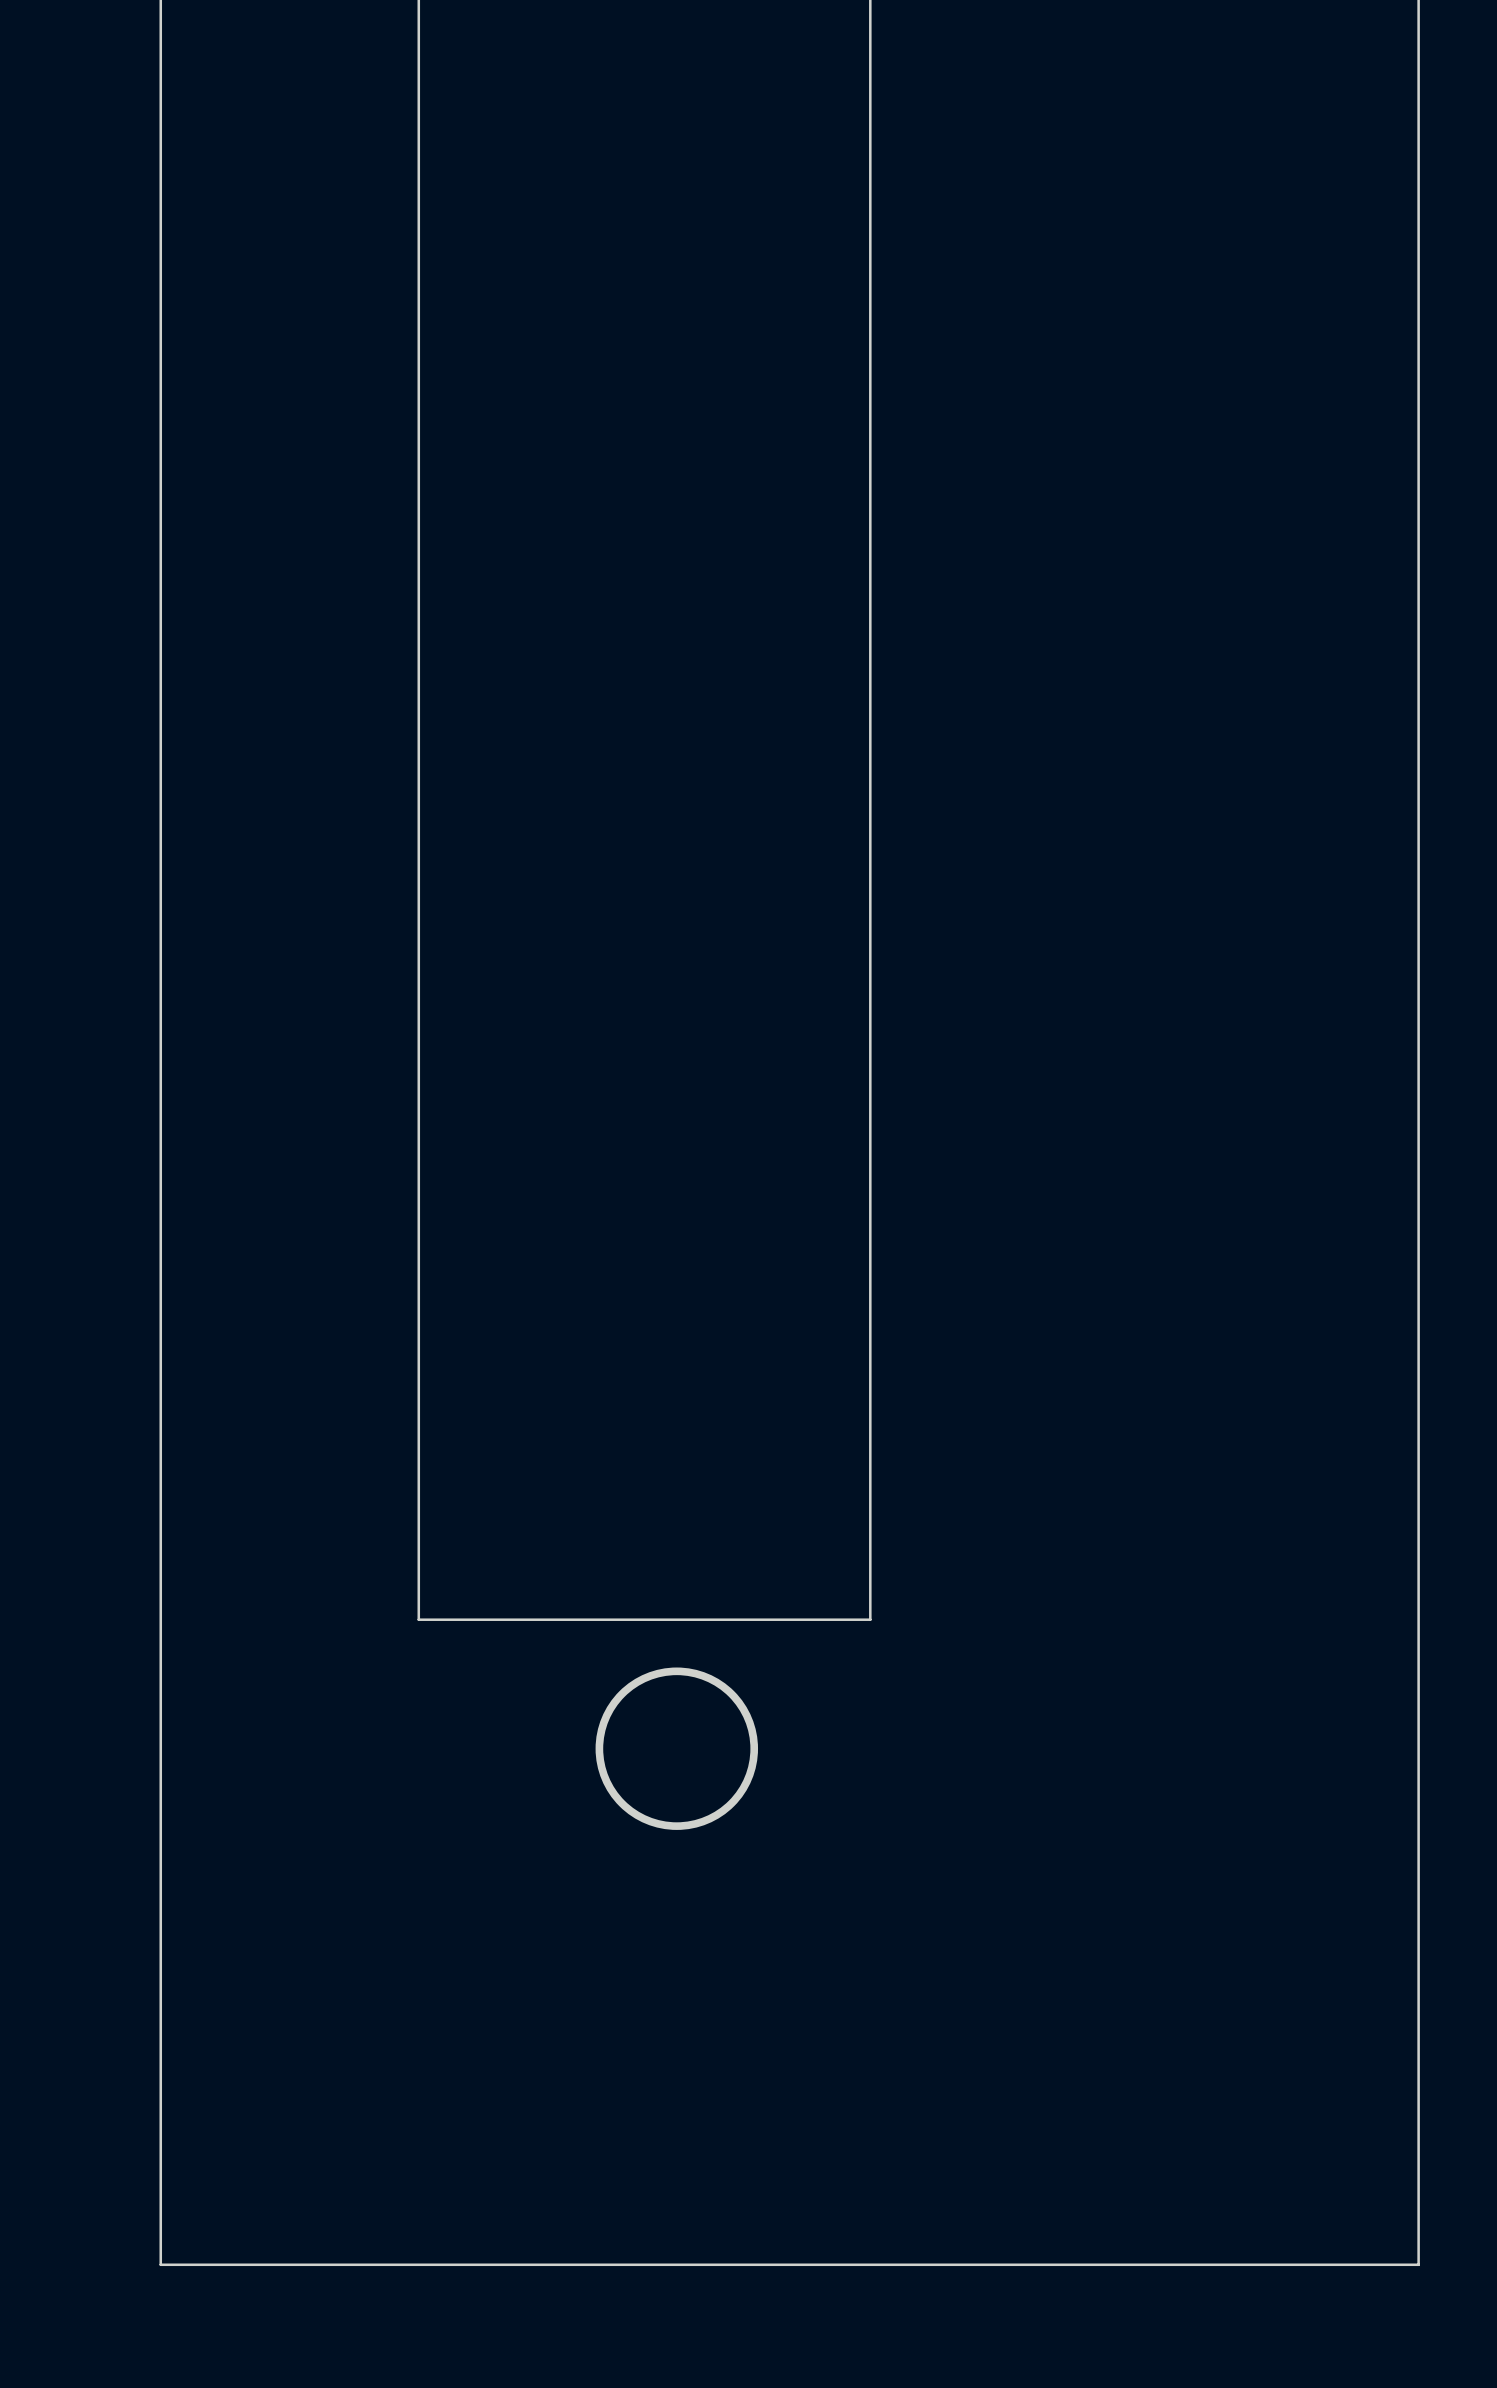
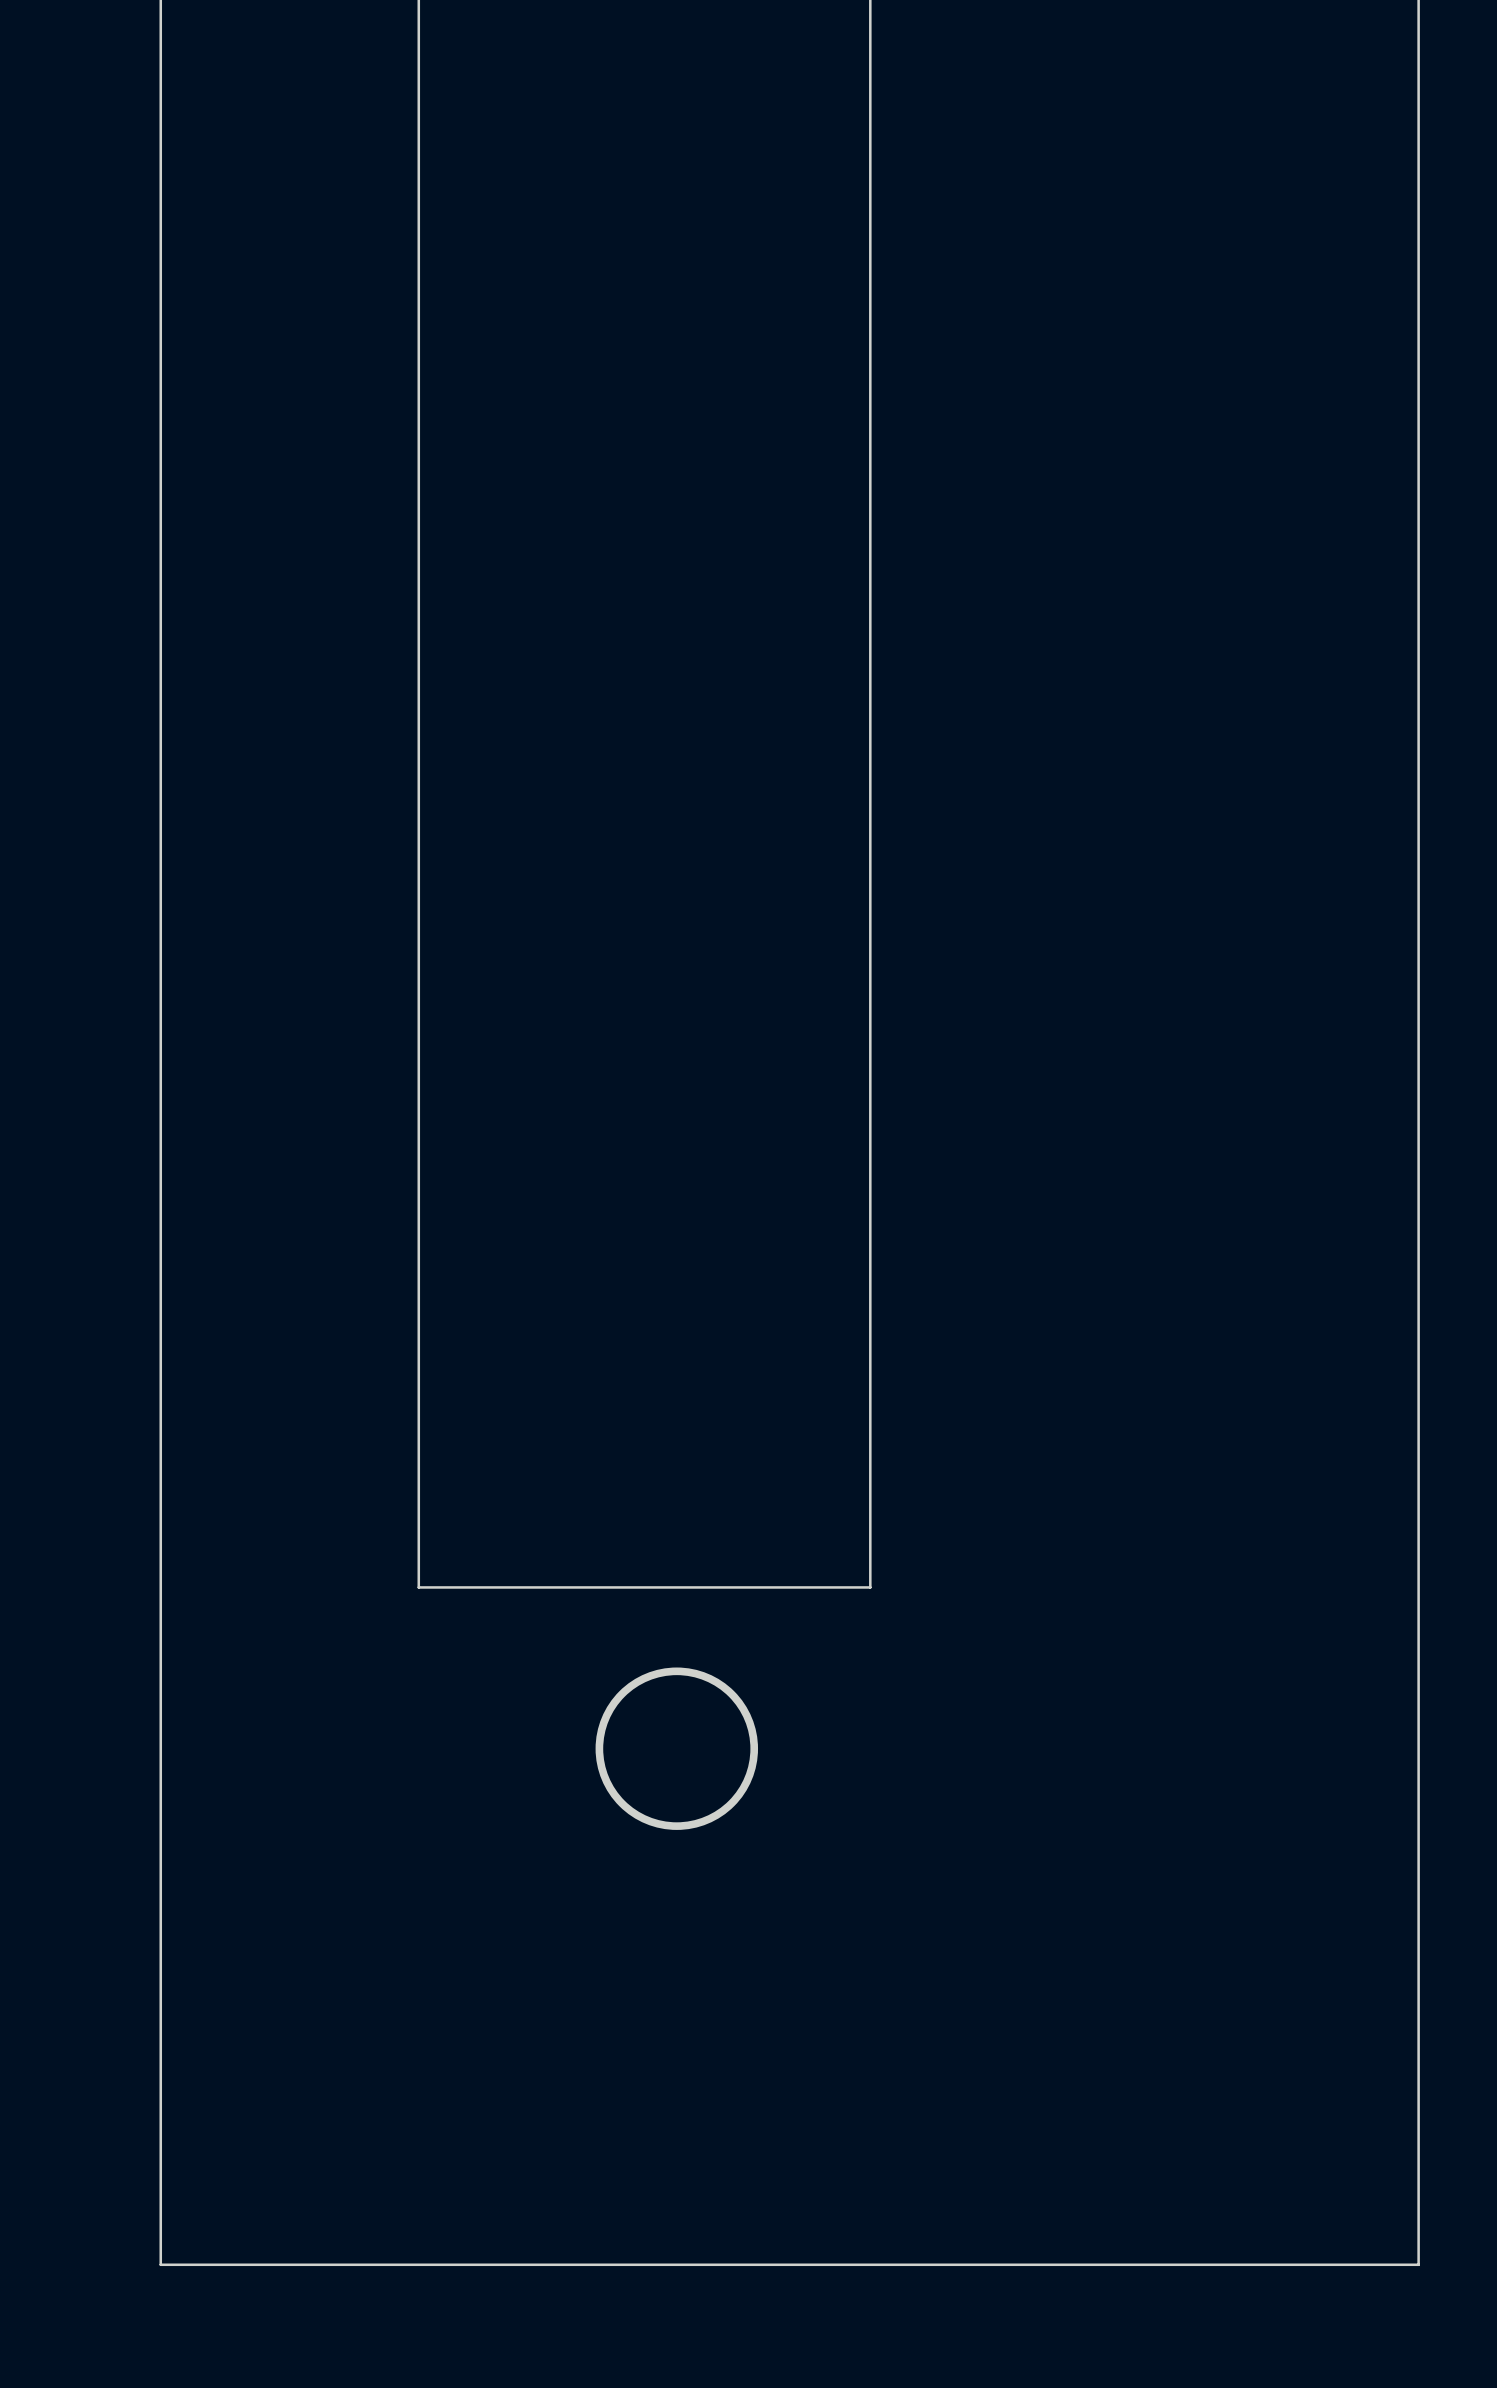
board edge: (870, 1587) (870, 1619) (418, 1619) (418, 1587) -> (870, 1587) (418, 1587)

